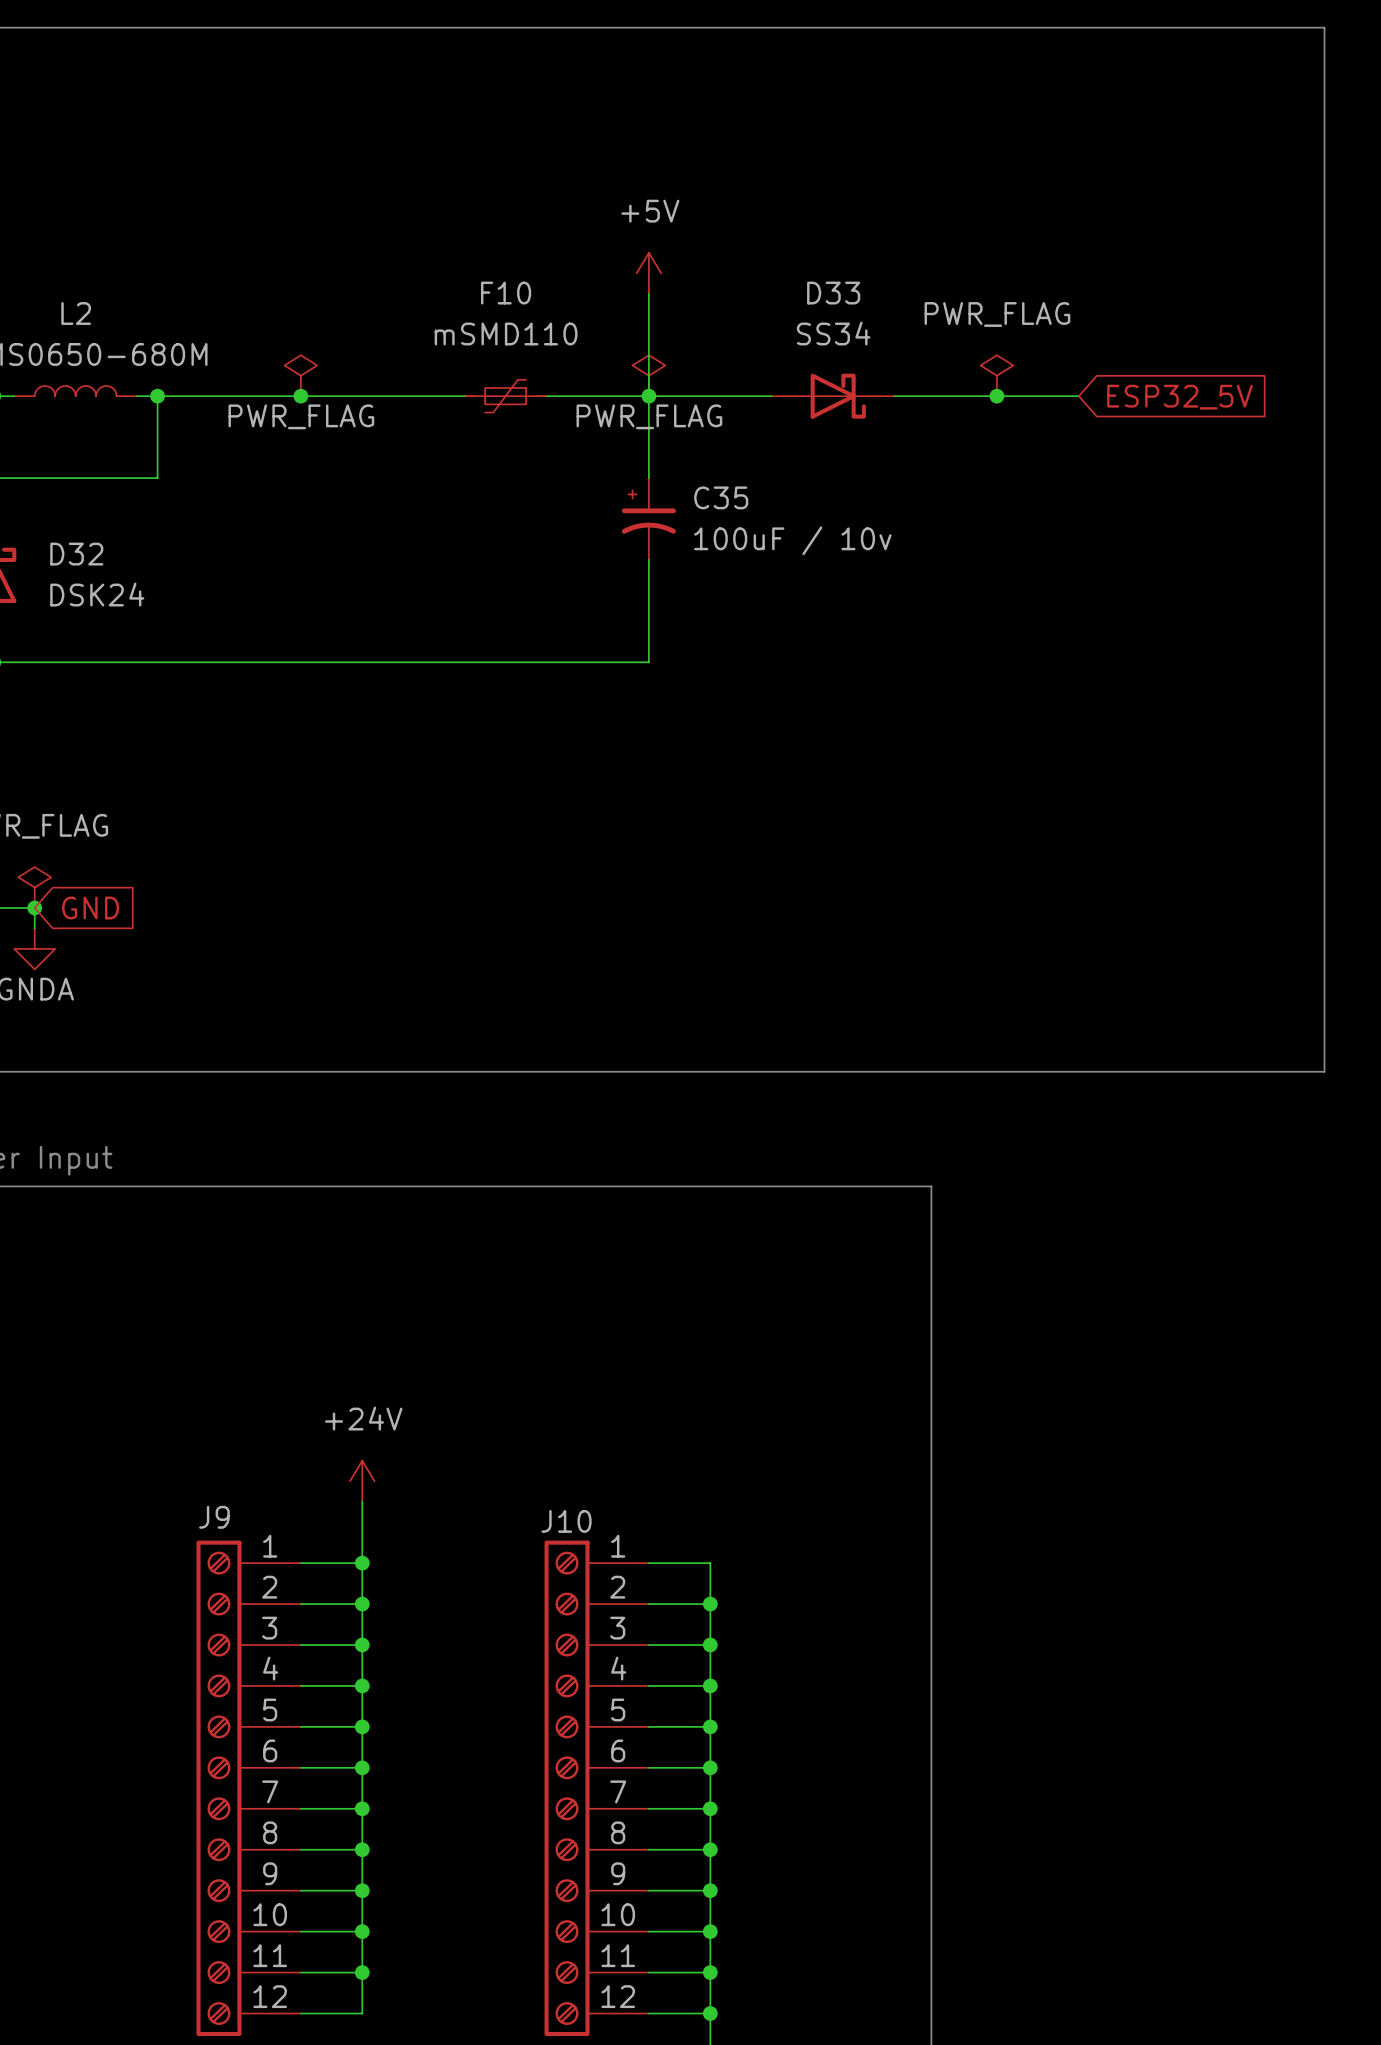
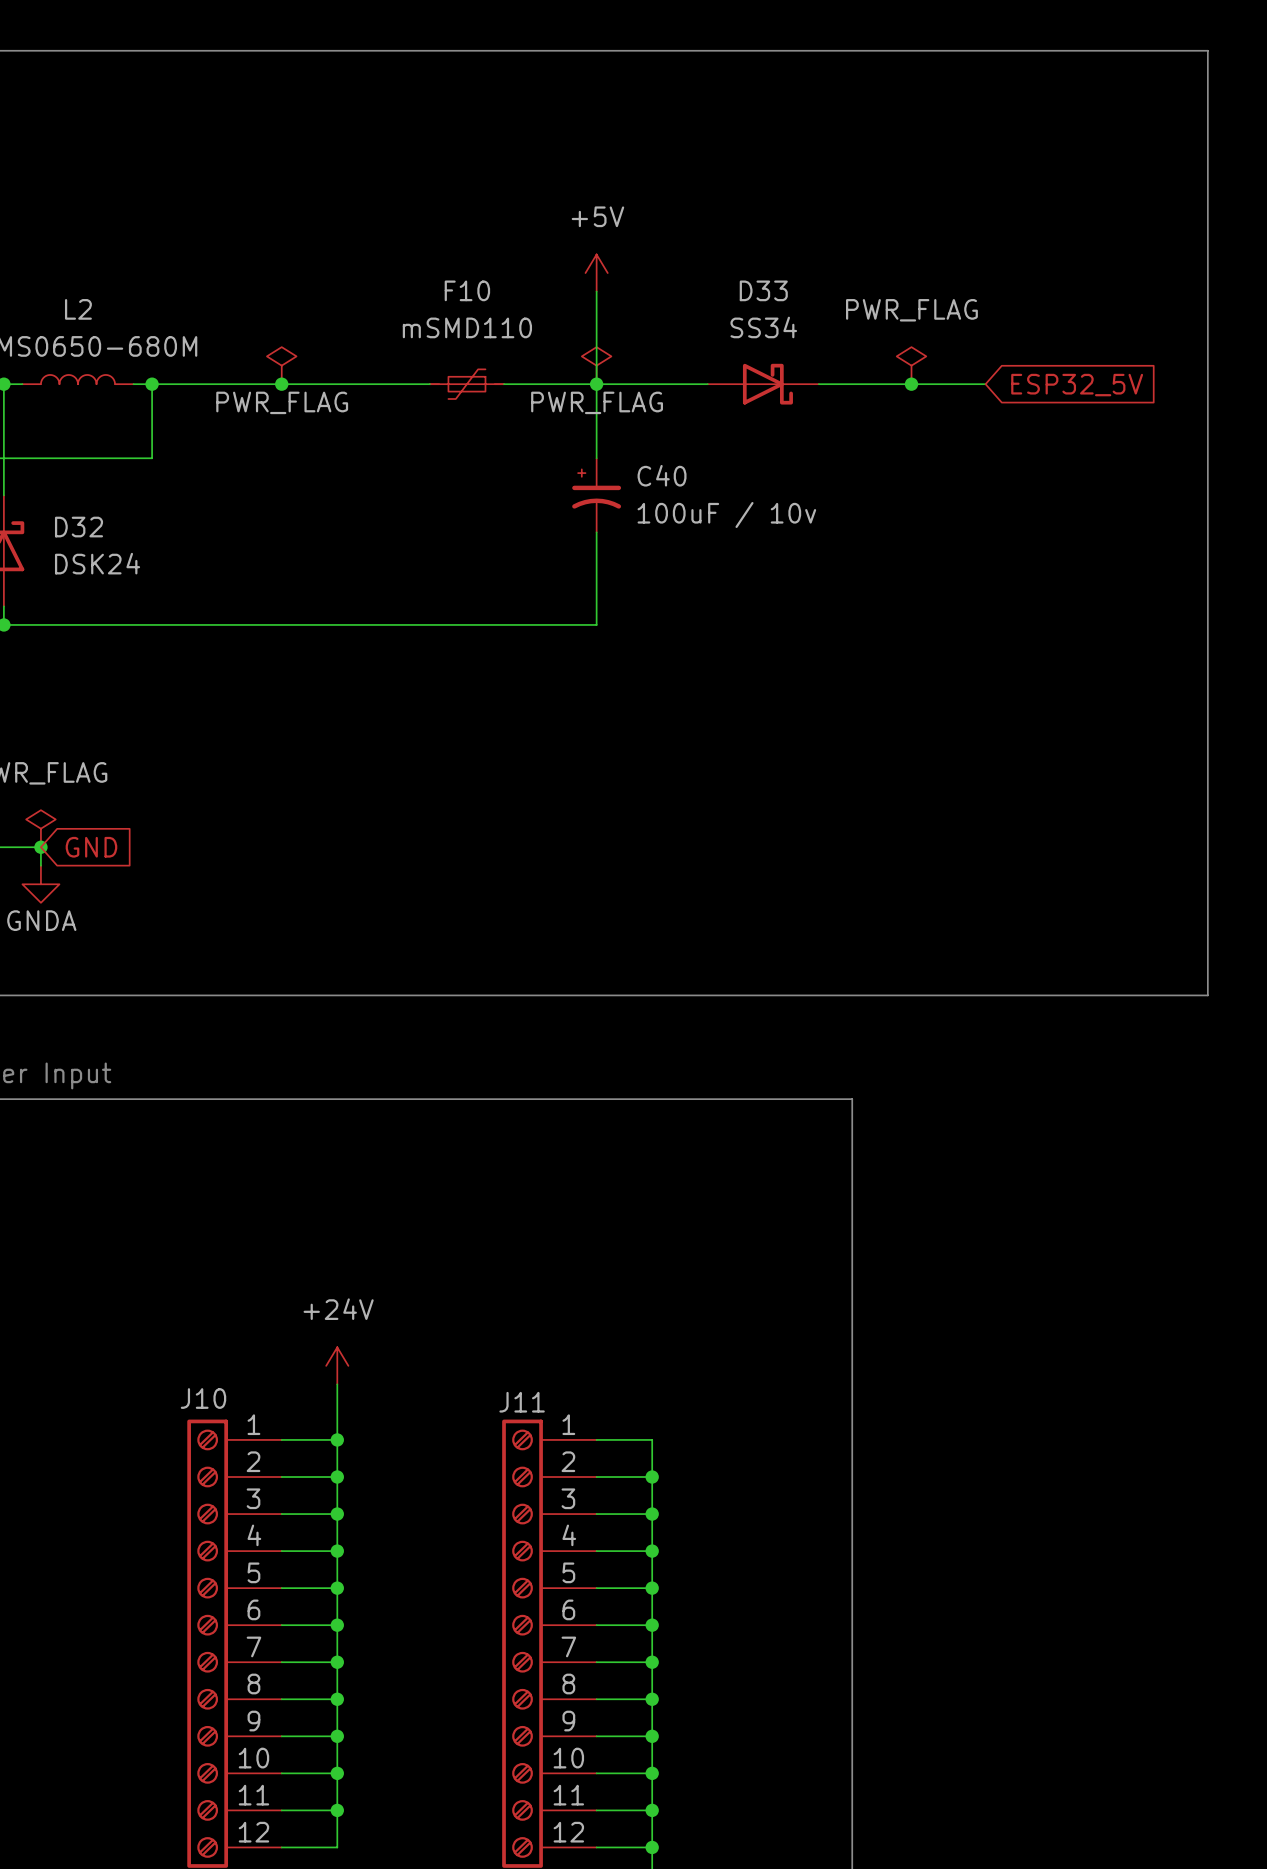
C35 name: C35 (721, 497) -> C40 (662, 475)
J9 name: J9 (214, 1517) -> J10 (203, 1398)
J10 name: J10 (566, 1521) -> J11 (522, 1402)

